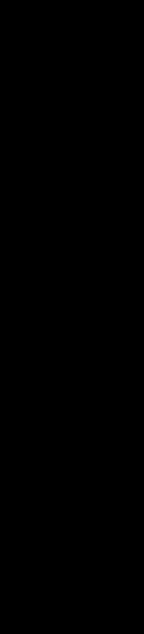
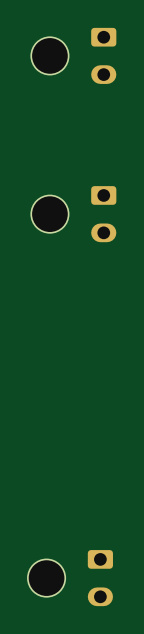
part: none -> (73, 55)
part: none -> (73, 214)
part: none -> (70, 578)

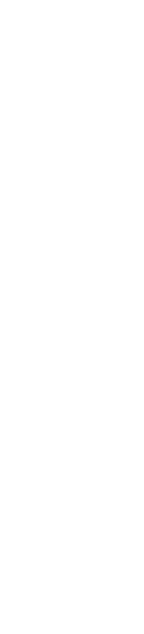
part: (73, 55) -> none
part: (73, 214) -> none
part: (70, 578) -> none

